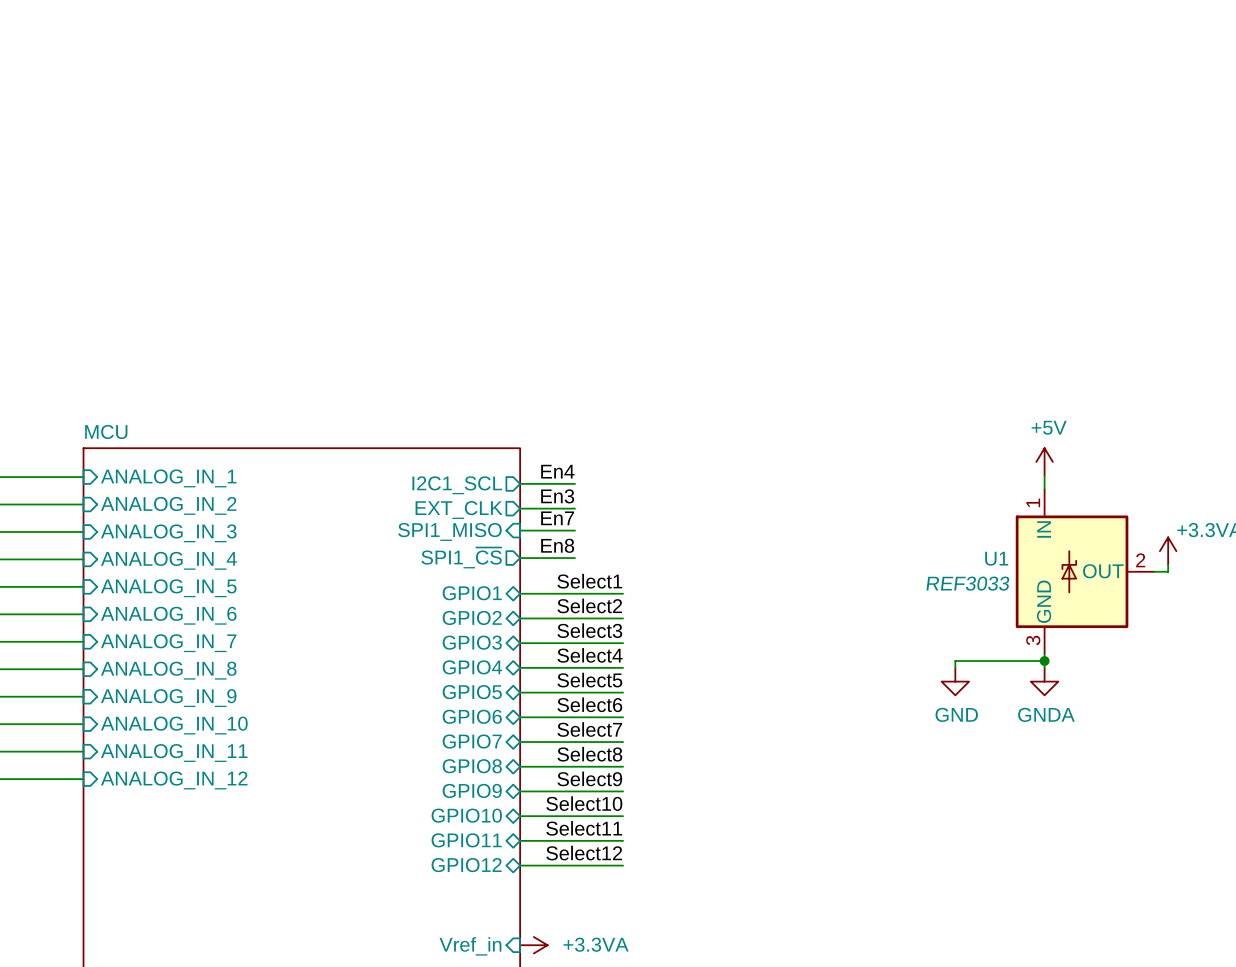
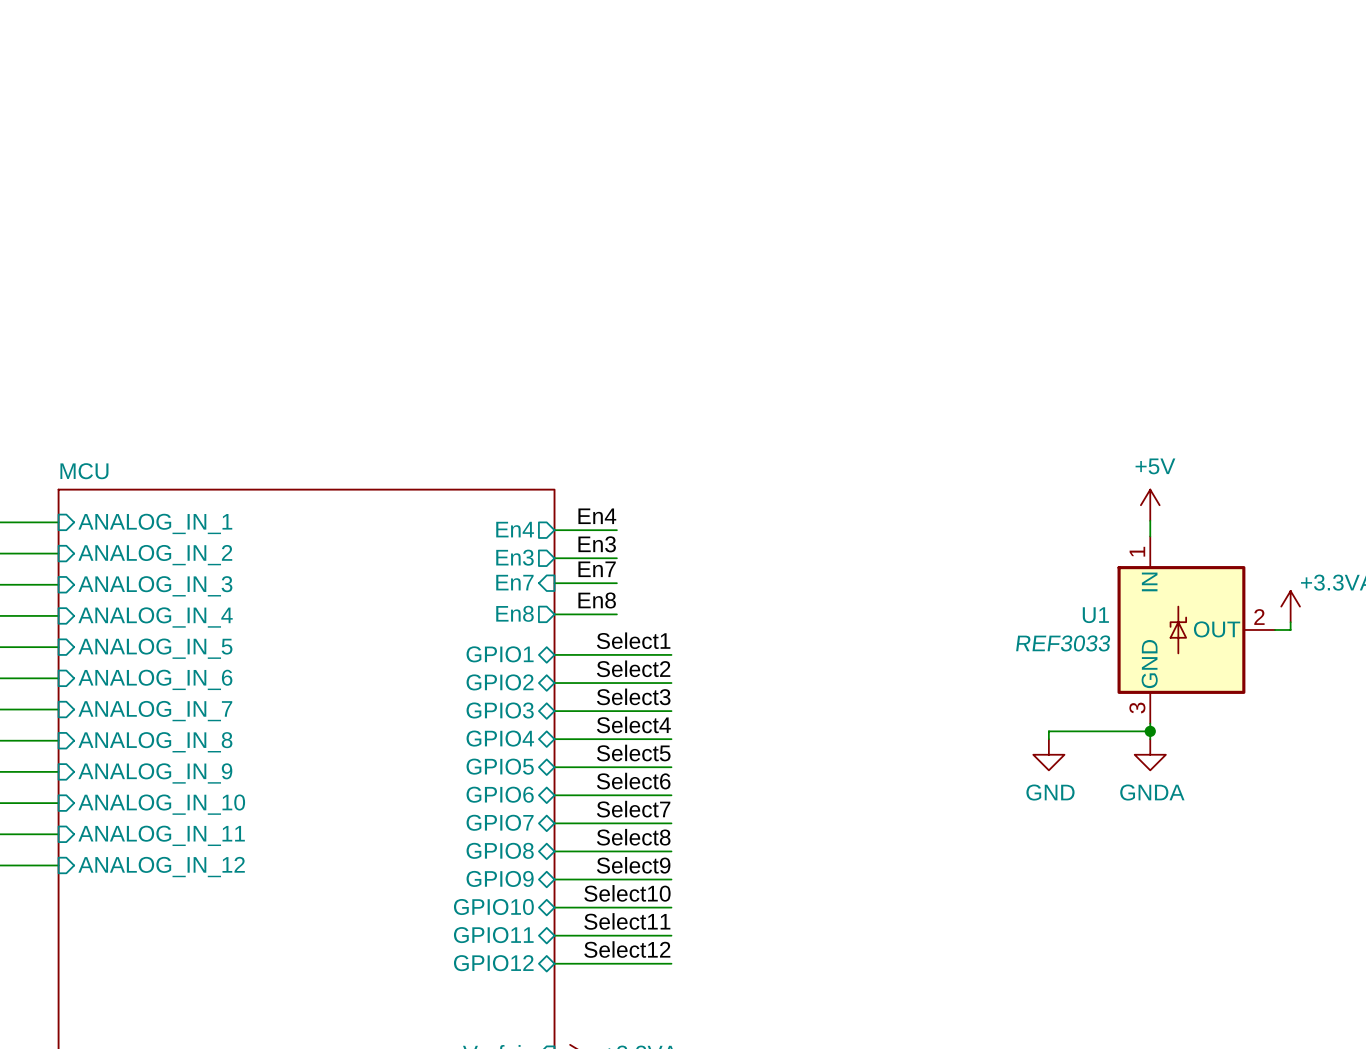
sheet pin: I2C1_SCL (457, 485) -> En4 (515, 529)
sheet pin: EXT_CLK (459, 509) -> En3 (514, 557)
sheet pin: SPI1_MISO (449, 531) -> En7 (514, 582)
sheet pin: SPI1_~{CS} (461, 557) -> En8 (514, 613)

